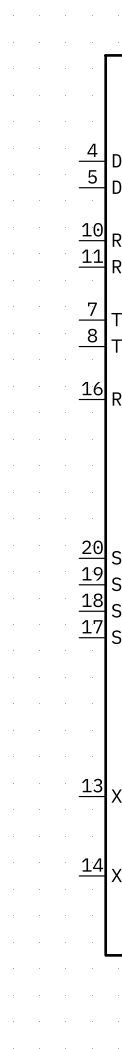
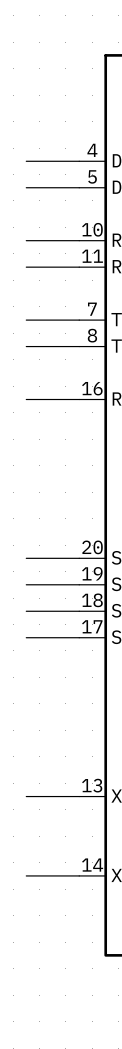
wire: none -> (26, 161) (79, 161)
wire: none -> (26, 187) (79, 187)
wire: none -> (26, 240) (79, 240)
wire: none -> (26, 267) (79, 267)
wire: none -> (26, 320) (79, 320)
wire: none -> (26, 346) (79, 346)
wire: none -> (26, 399) (79, 399)
wire: none -> (26, 558) (79, 558)
wire: none -> (26, 584) (79, 584)
wire: none -> (26, 611) (79, 611)
wire: none -> (26, 637) (79, 637)
wire: none -> (26, 796) (79, 796)
wire: none -> (26, 875) (79, 875)

